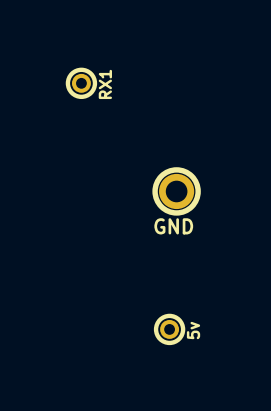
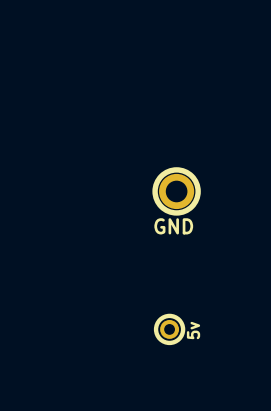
part: RX1 (81, 83) -> none

